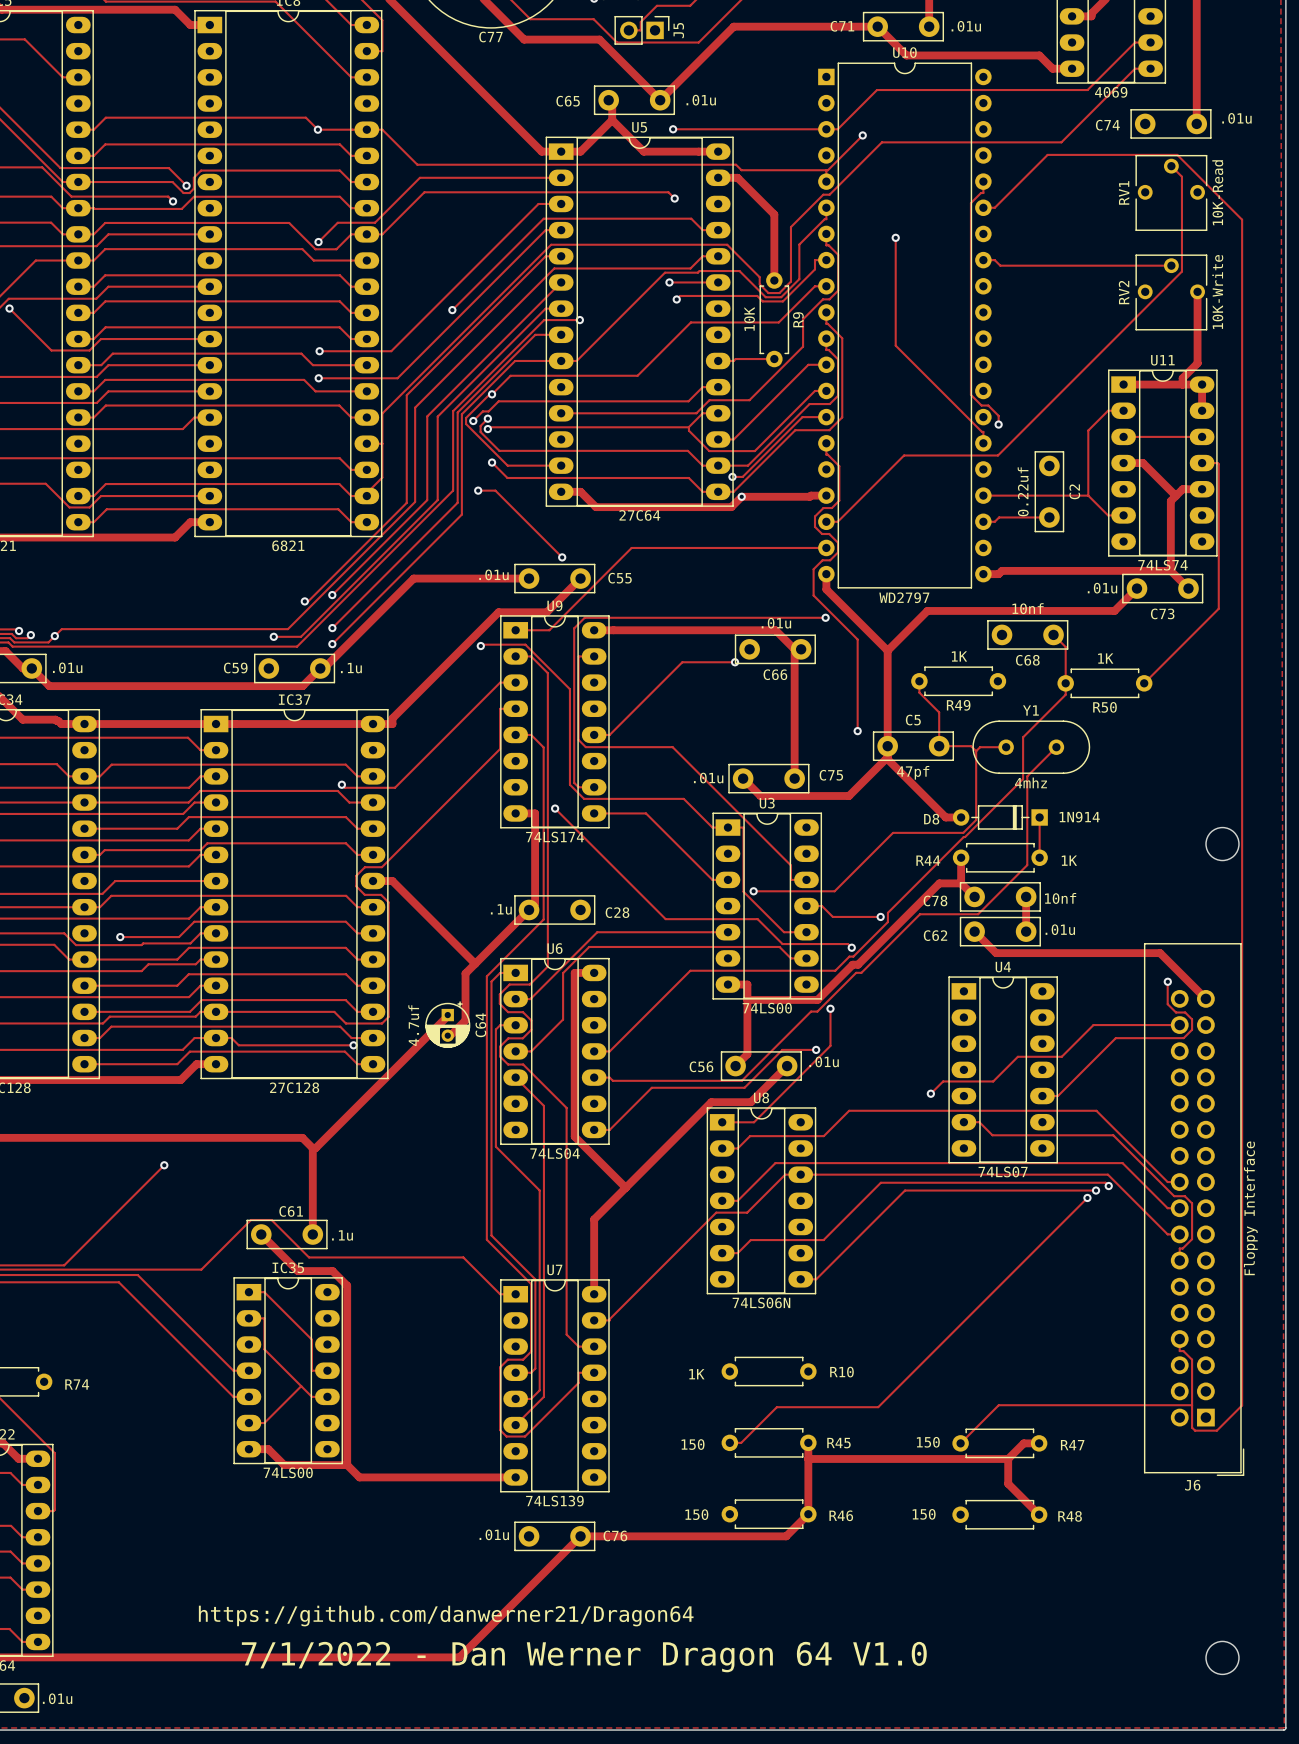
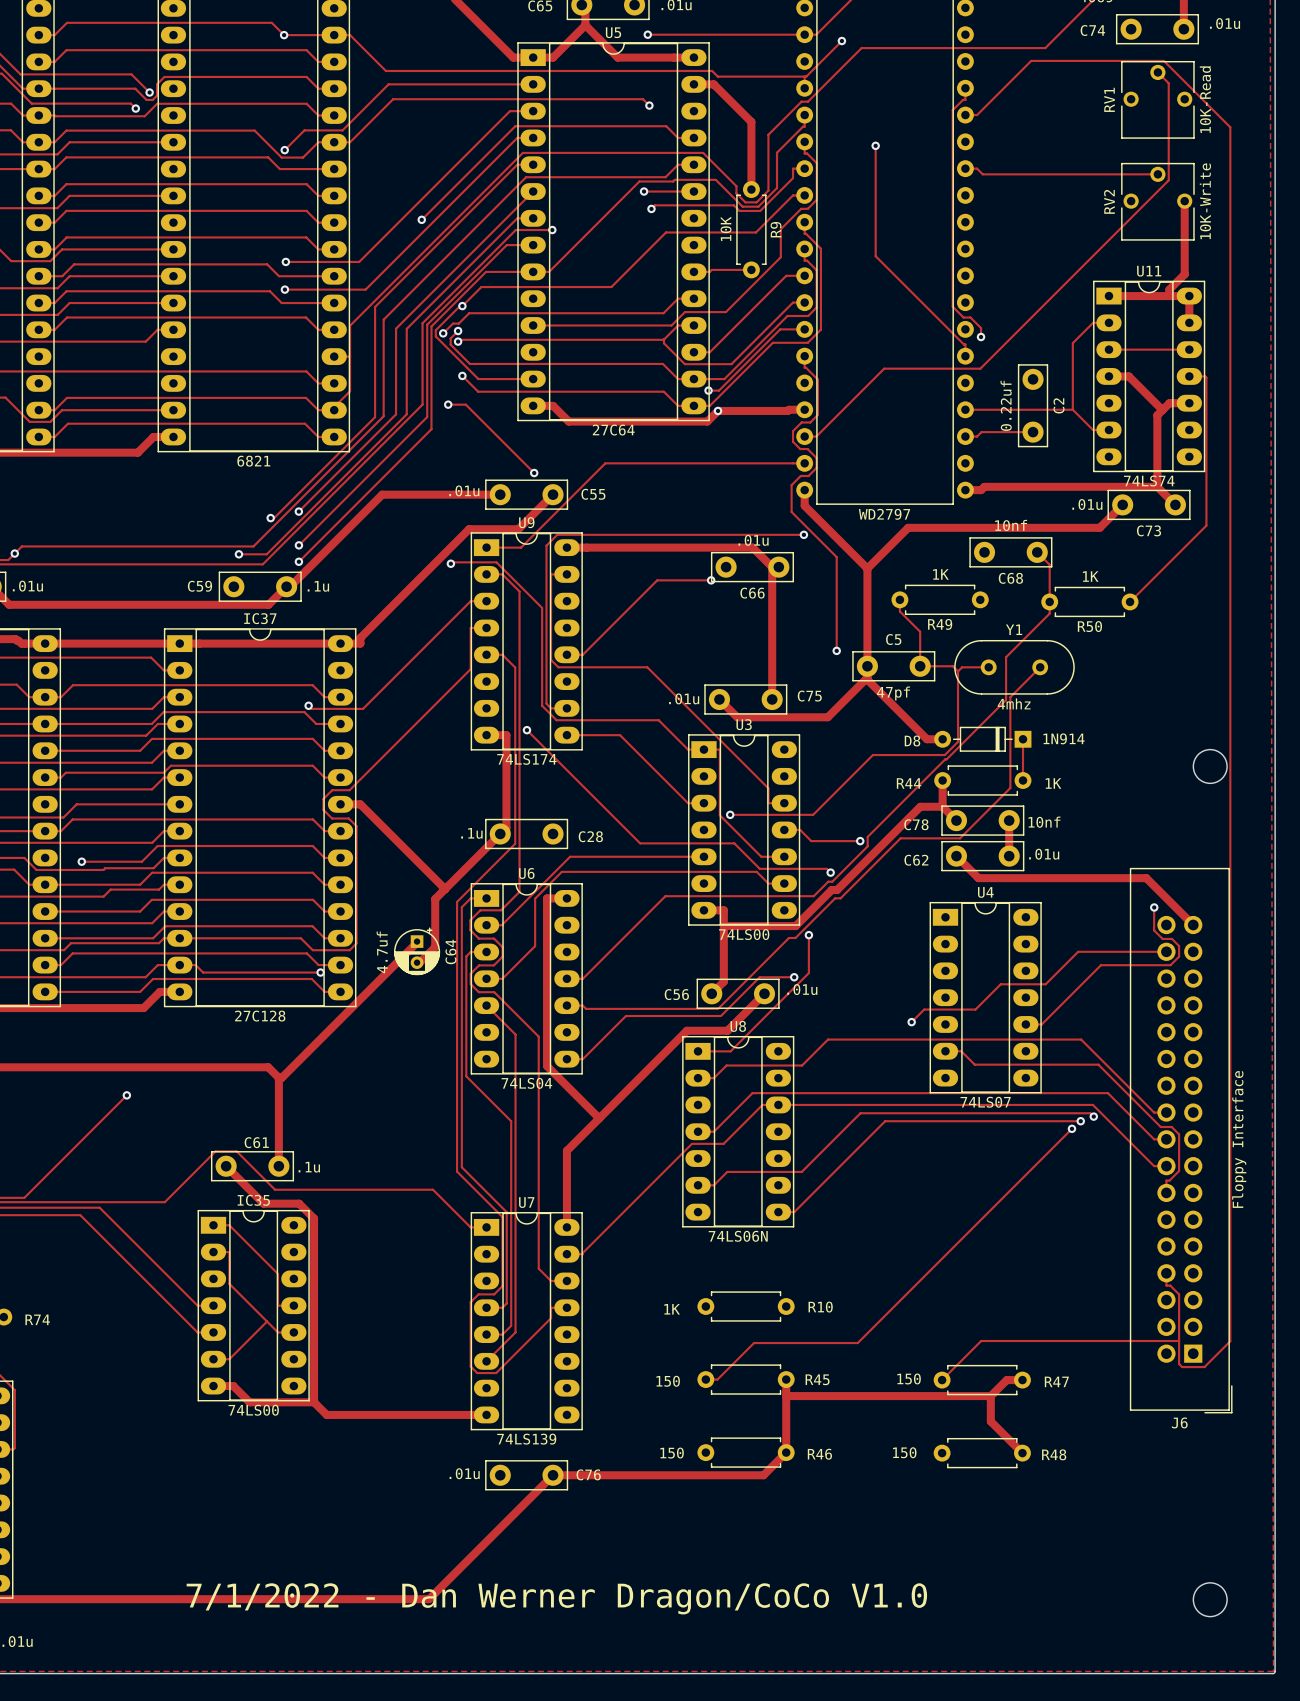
text: https://github.com/danwerner21/Dragon64 (446, 1616) -> none
text: 7/1/2022 - Dan Werner Dragon 64 V1.0 (584, 1657) -> 7/1/2022 - Dan Werner Dragon/CoCo V1.0 (556, 1598)

